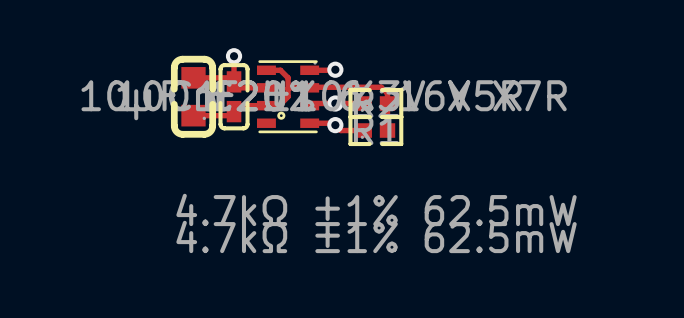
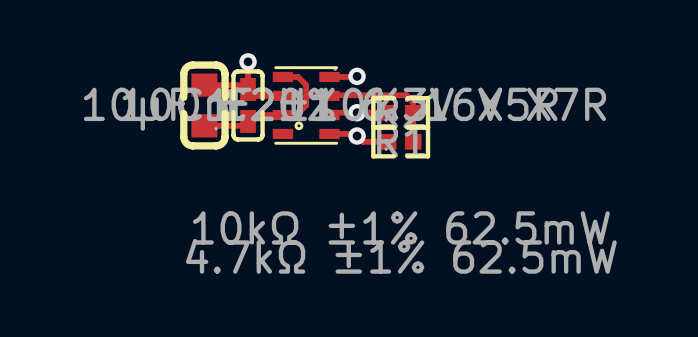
part value: 4.7kΩ ±1% 62.5mW (376, 209) -> 10kΩ ±1% 62.5mW (401, 227)

